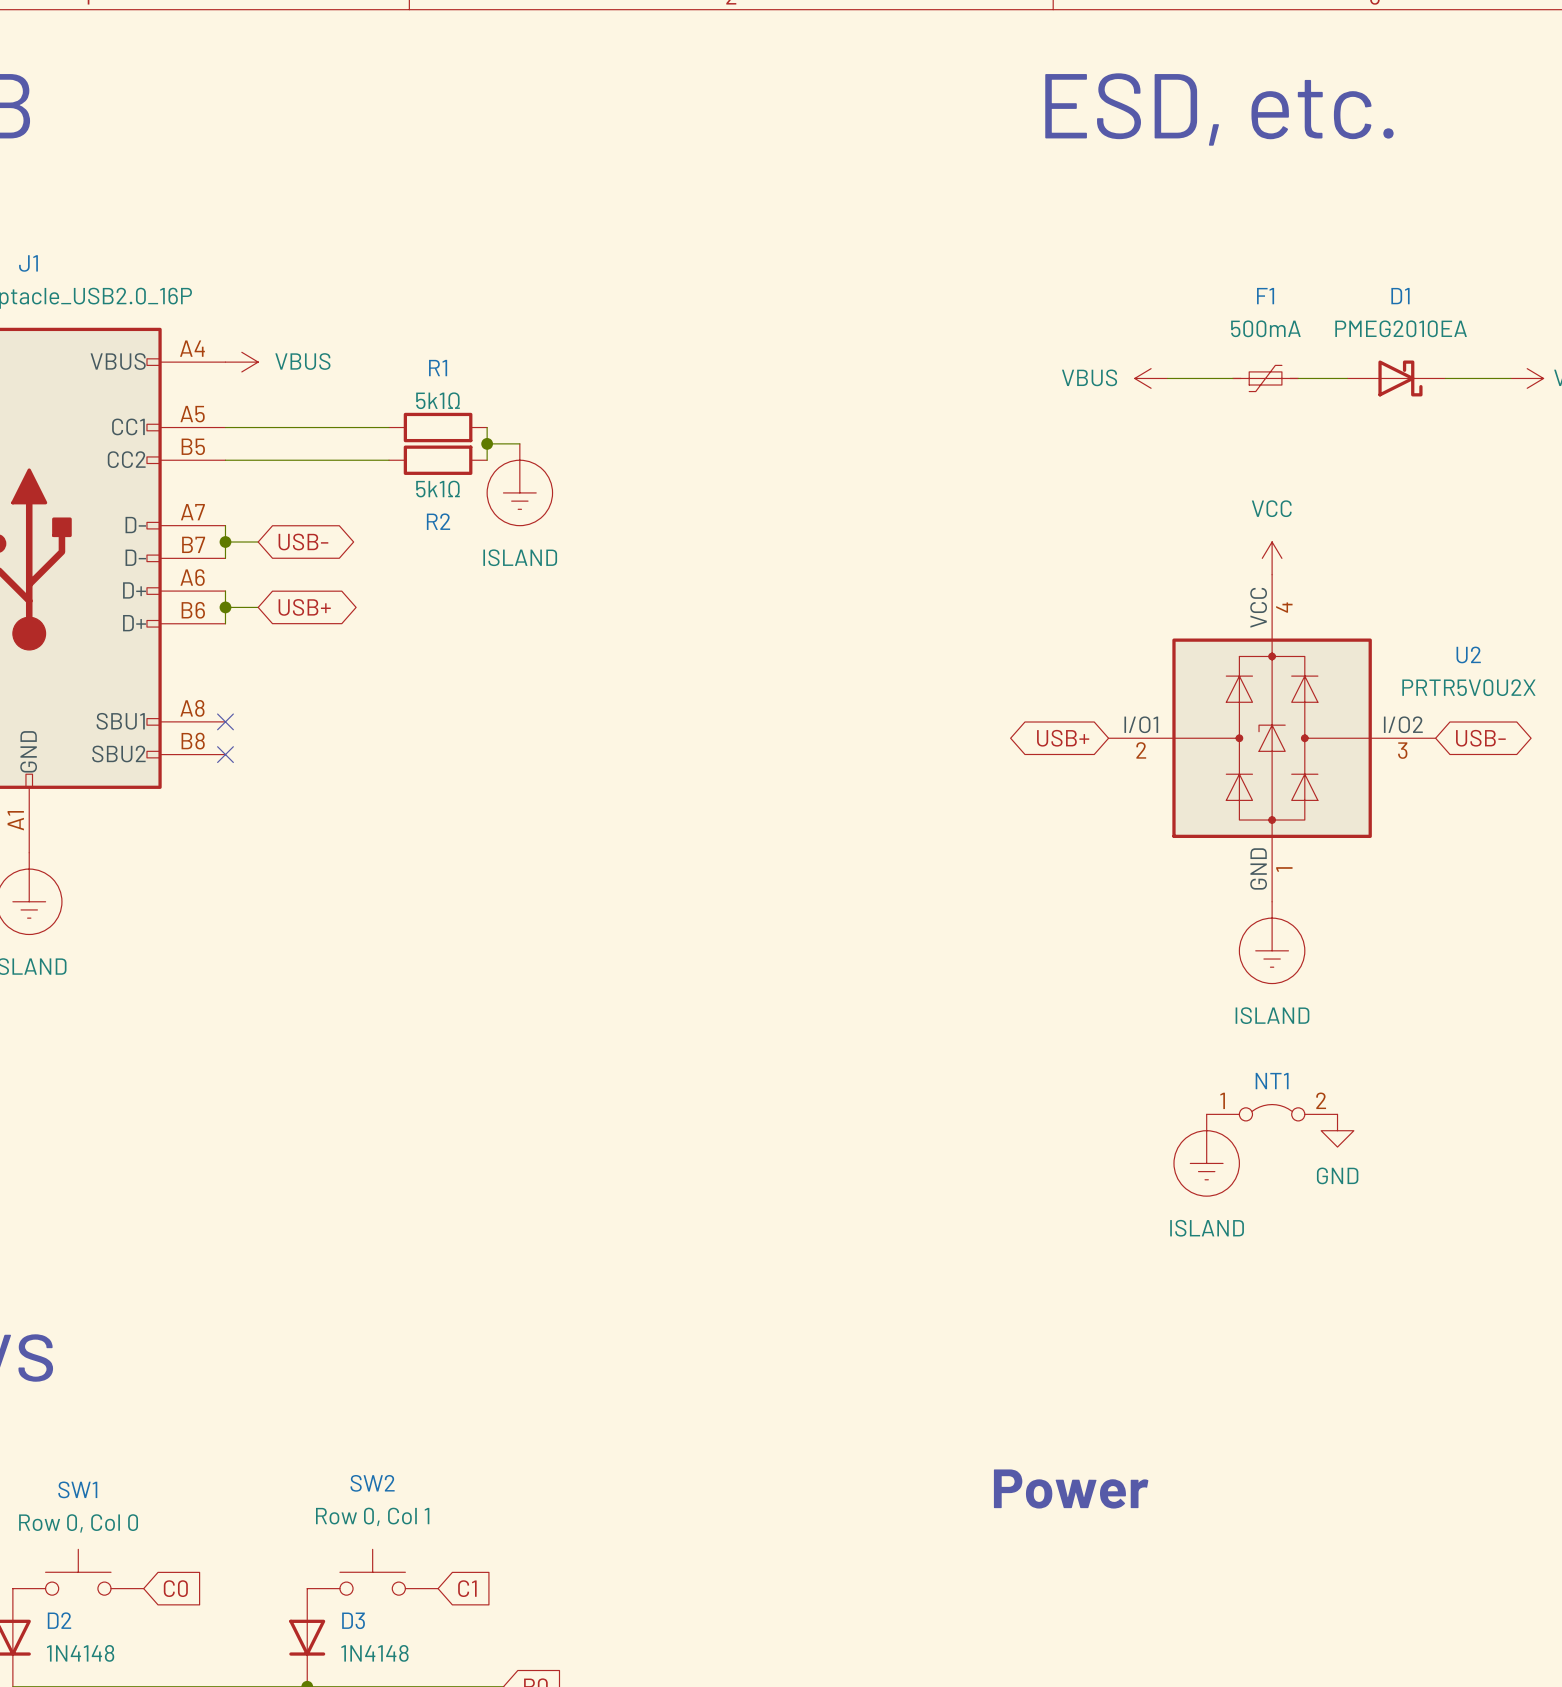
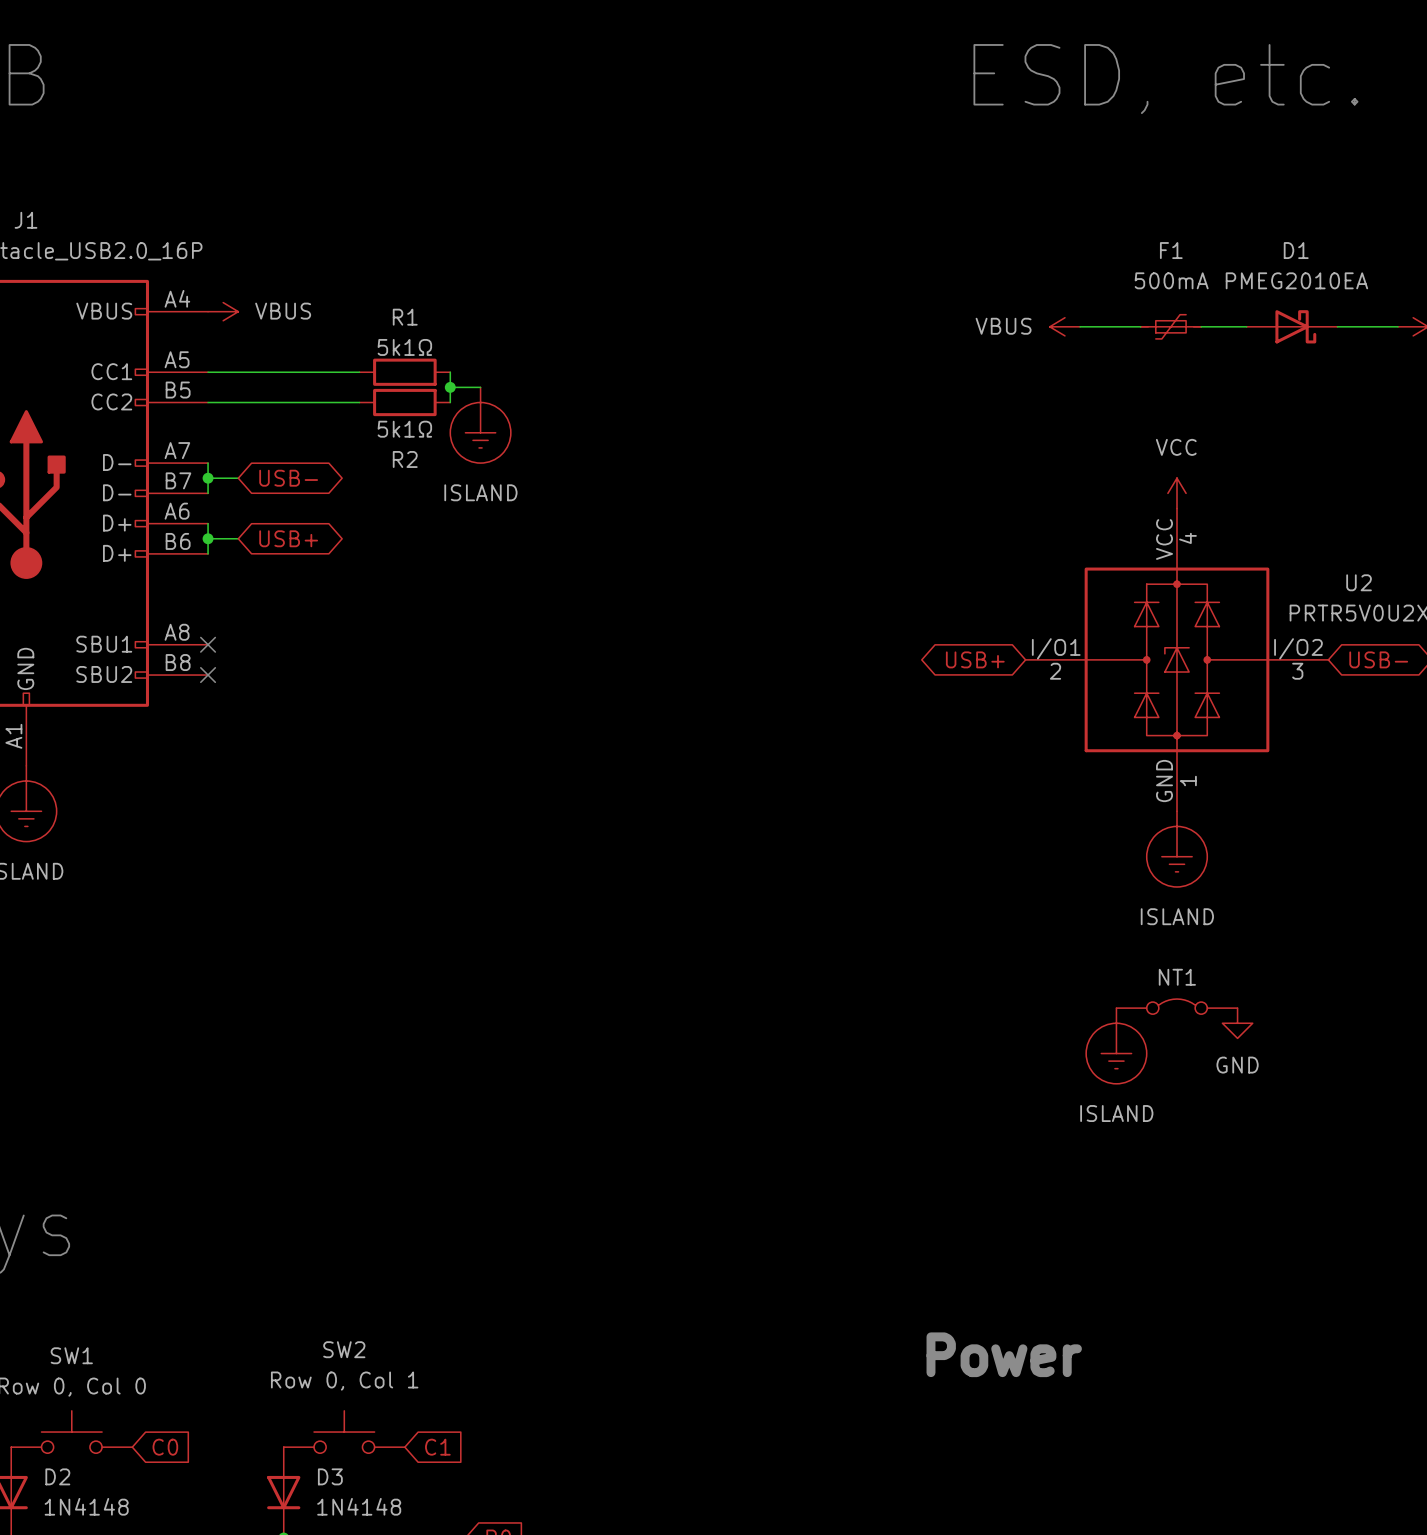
NT1 pin number: 1 (1222, 1100) -> none
NT1 pin number: 2 (1321, 1100) -> none

